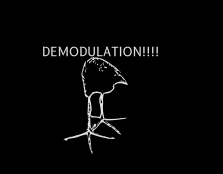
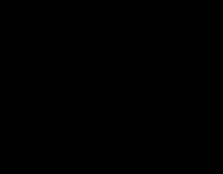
drawing: [63, 57, 128, 154] -> none

